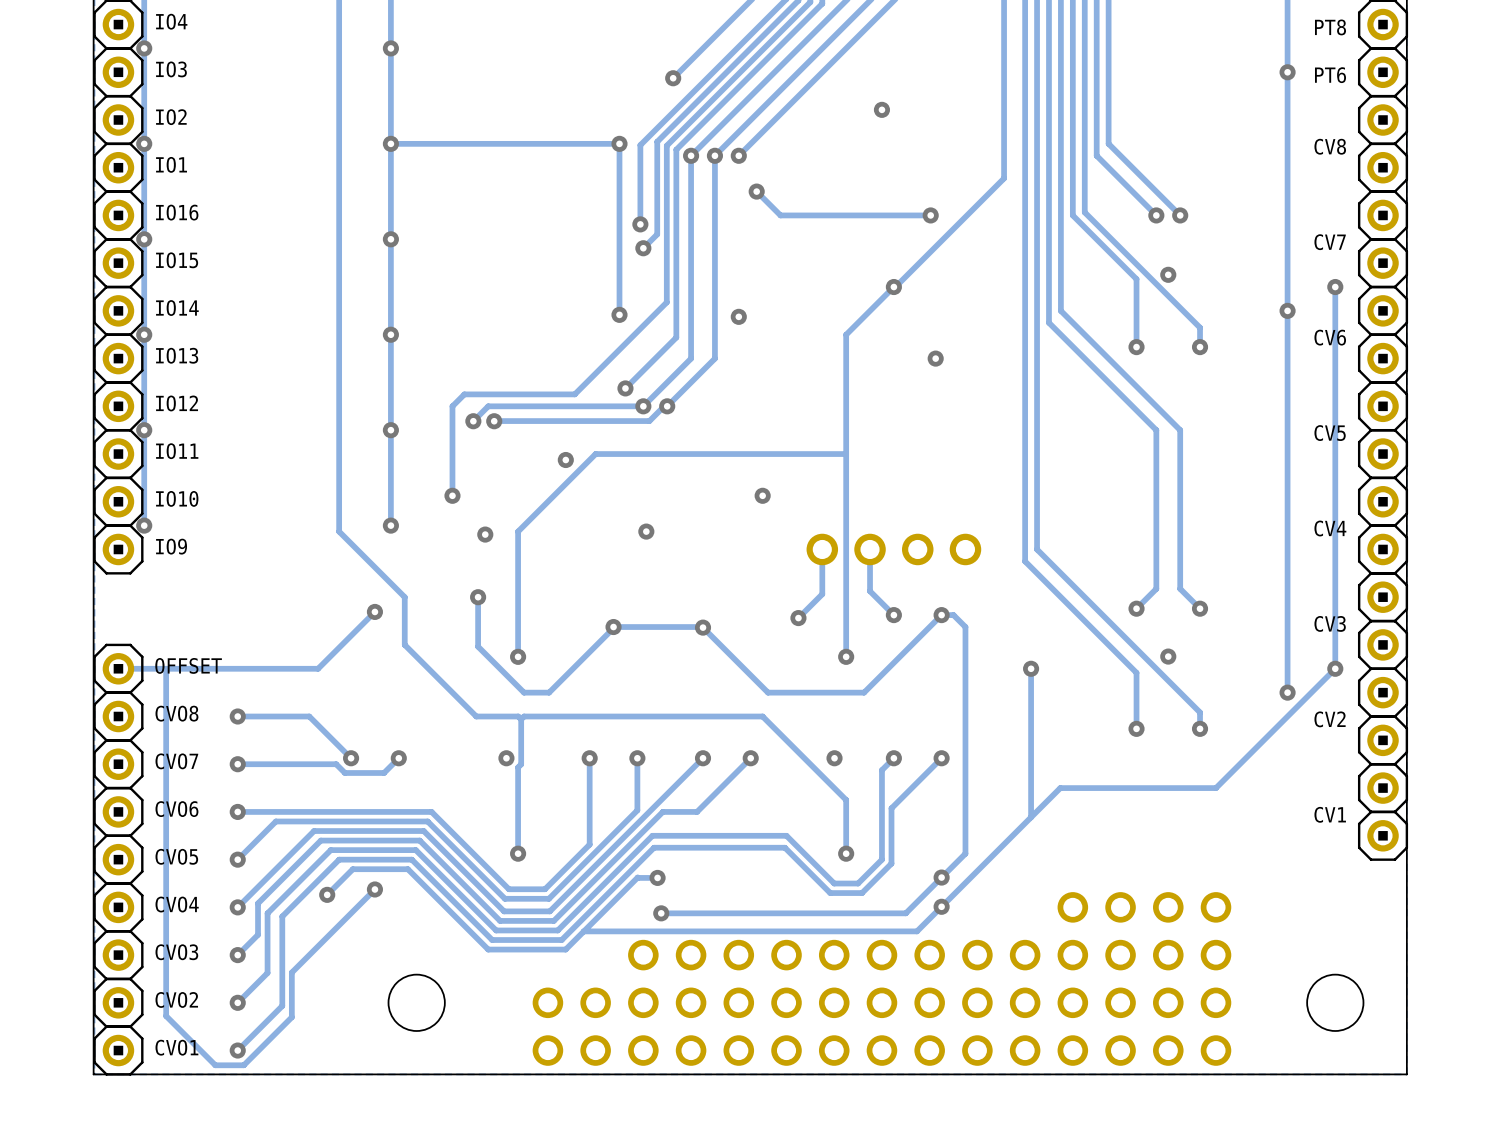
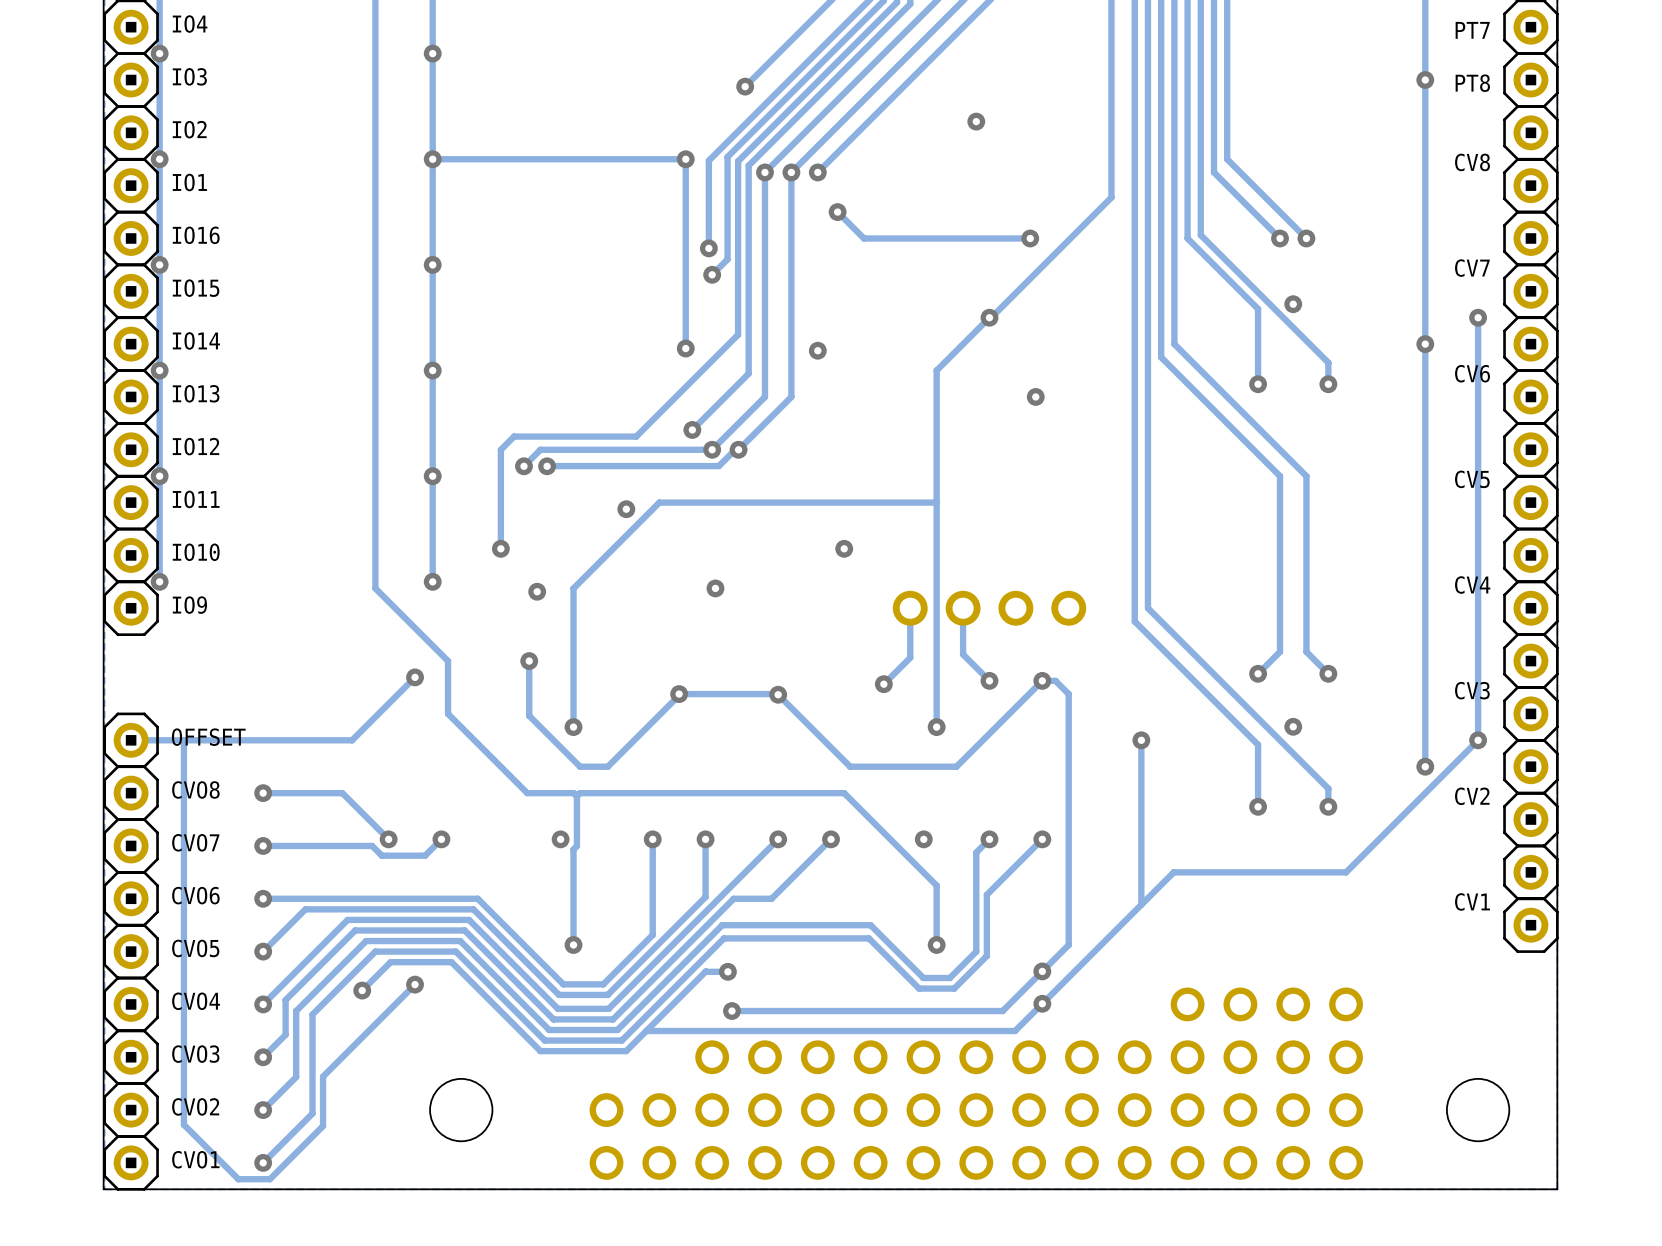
PT8 name: PT8 (1330, 27) -> PT7 (1472, 30)
PT6 name: PT6 (1330, 75) -> PT8 (1472, 83)

